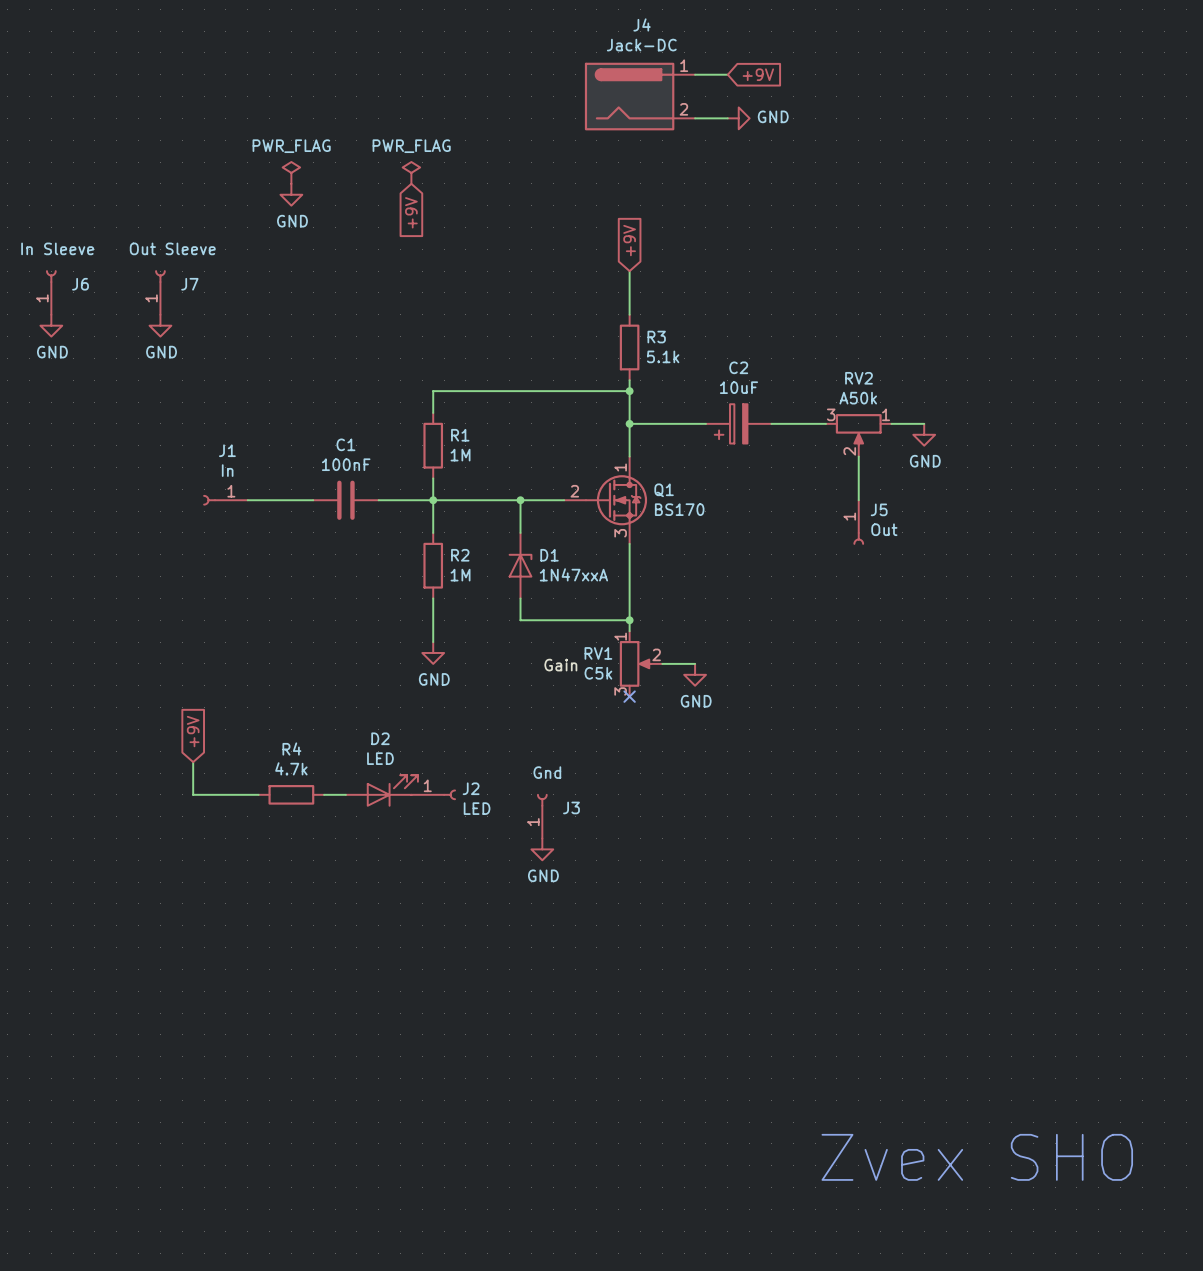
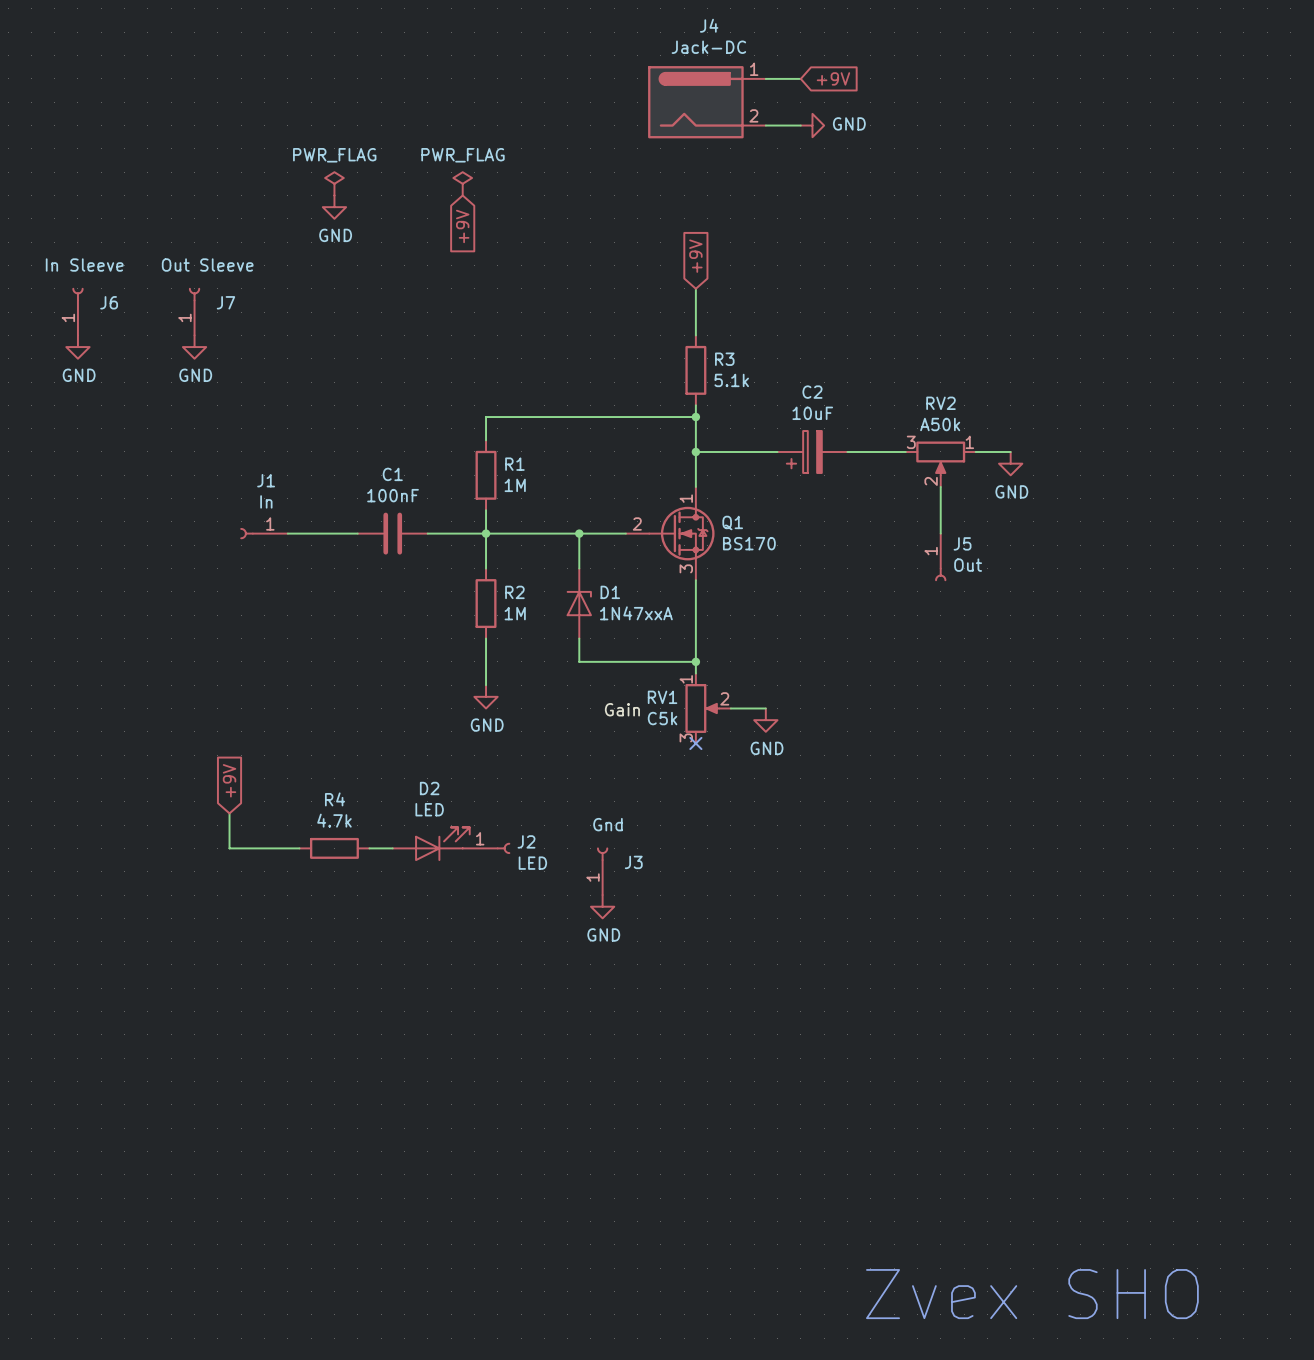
text position: Zvex SHO (977, 1157) -> Zvex SHO (1032, 1294)

